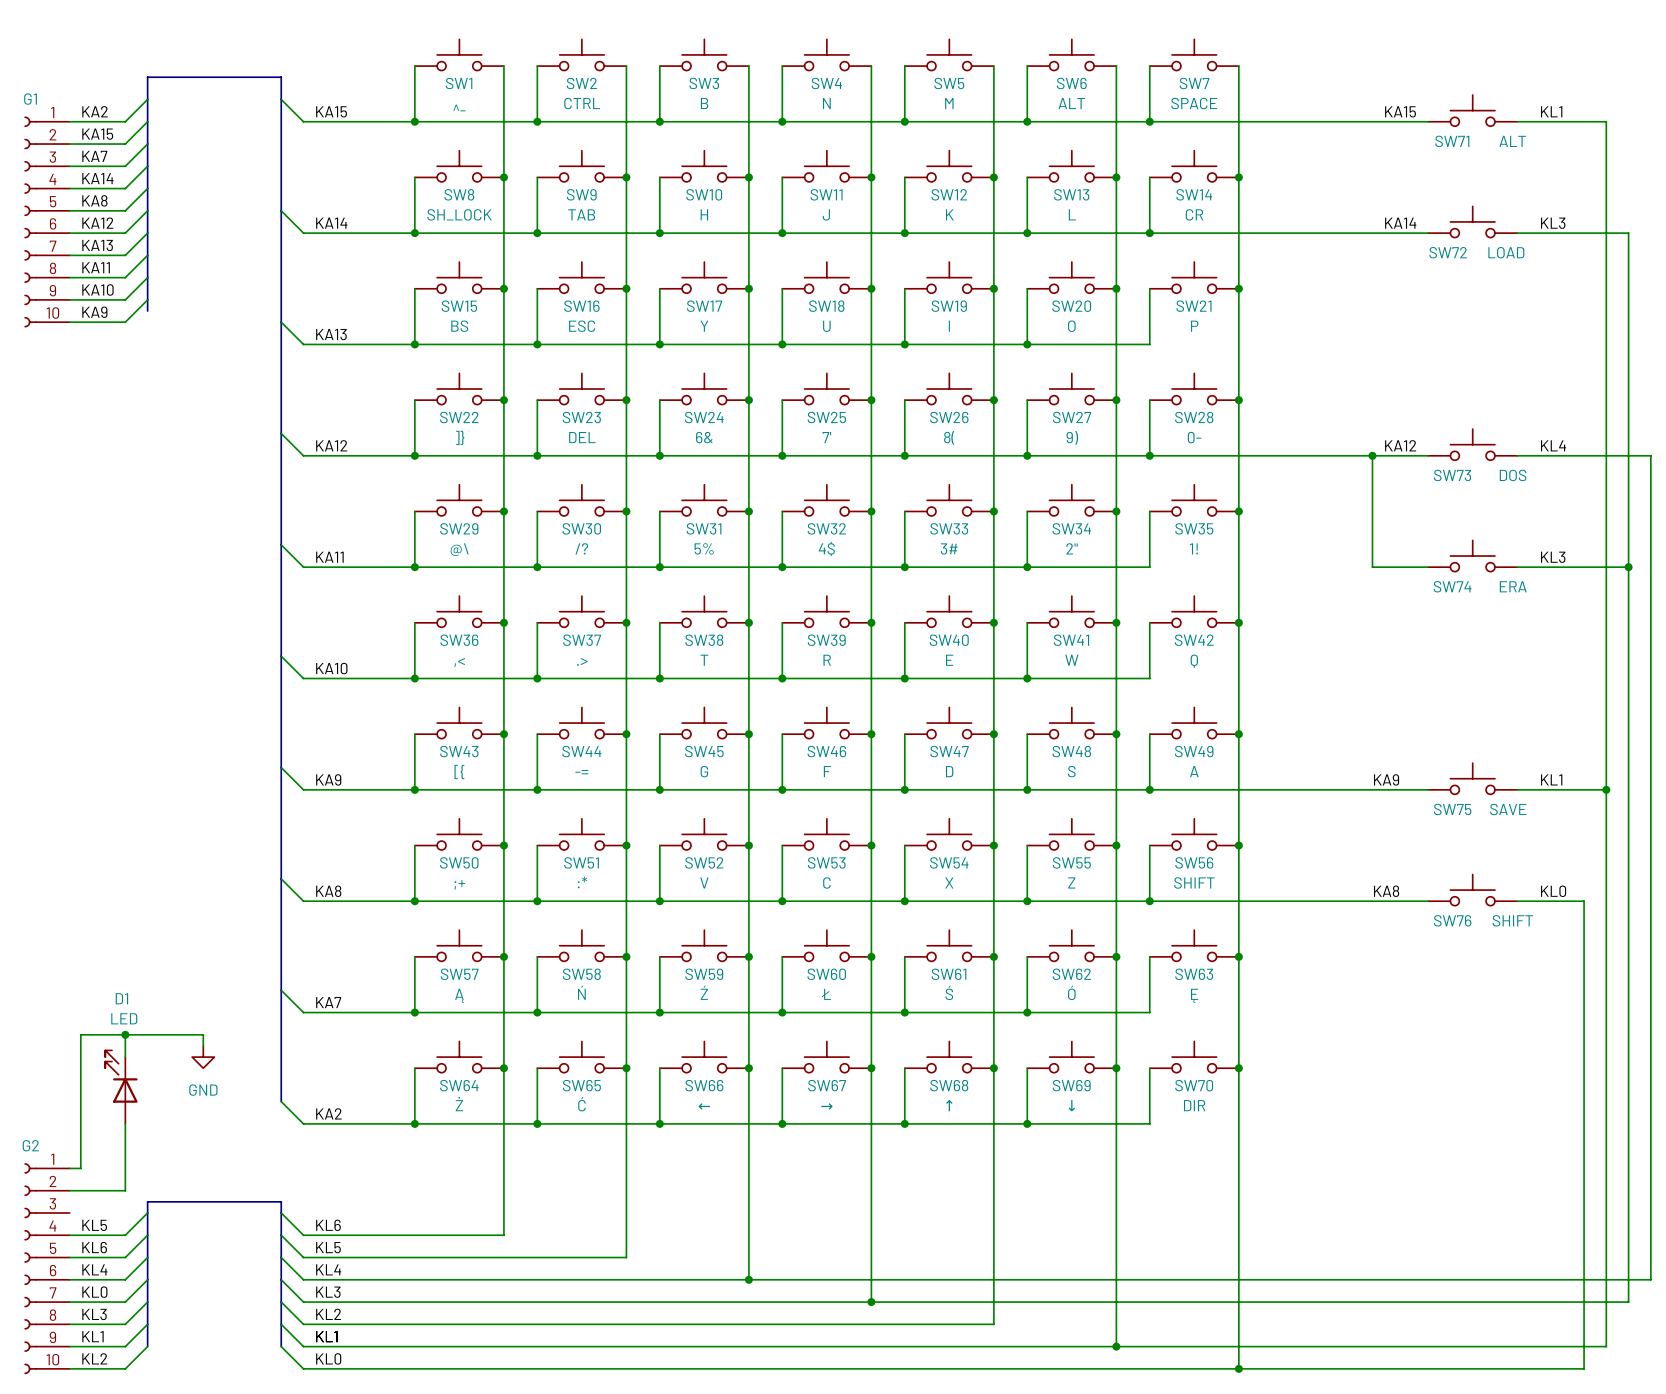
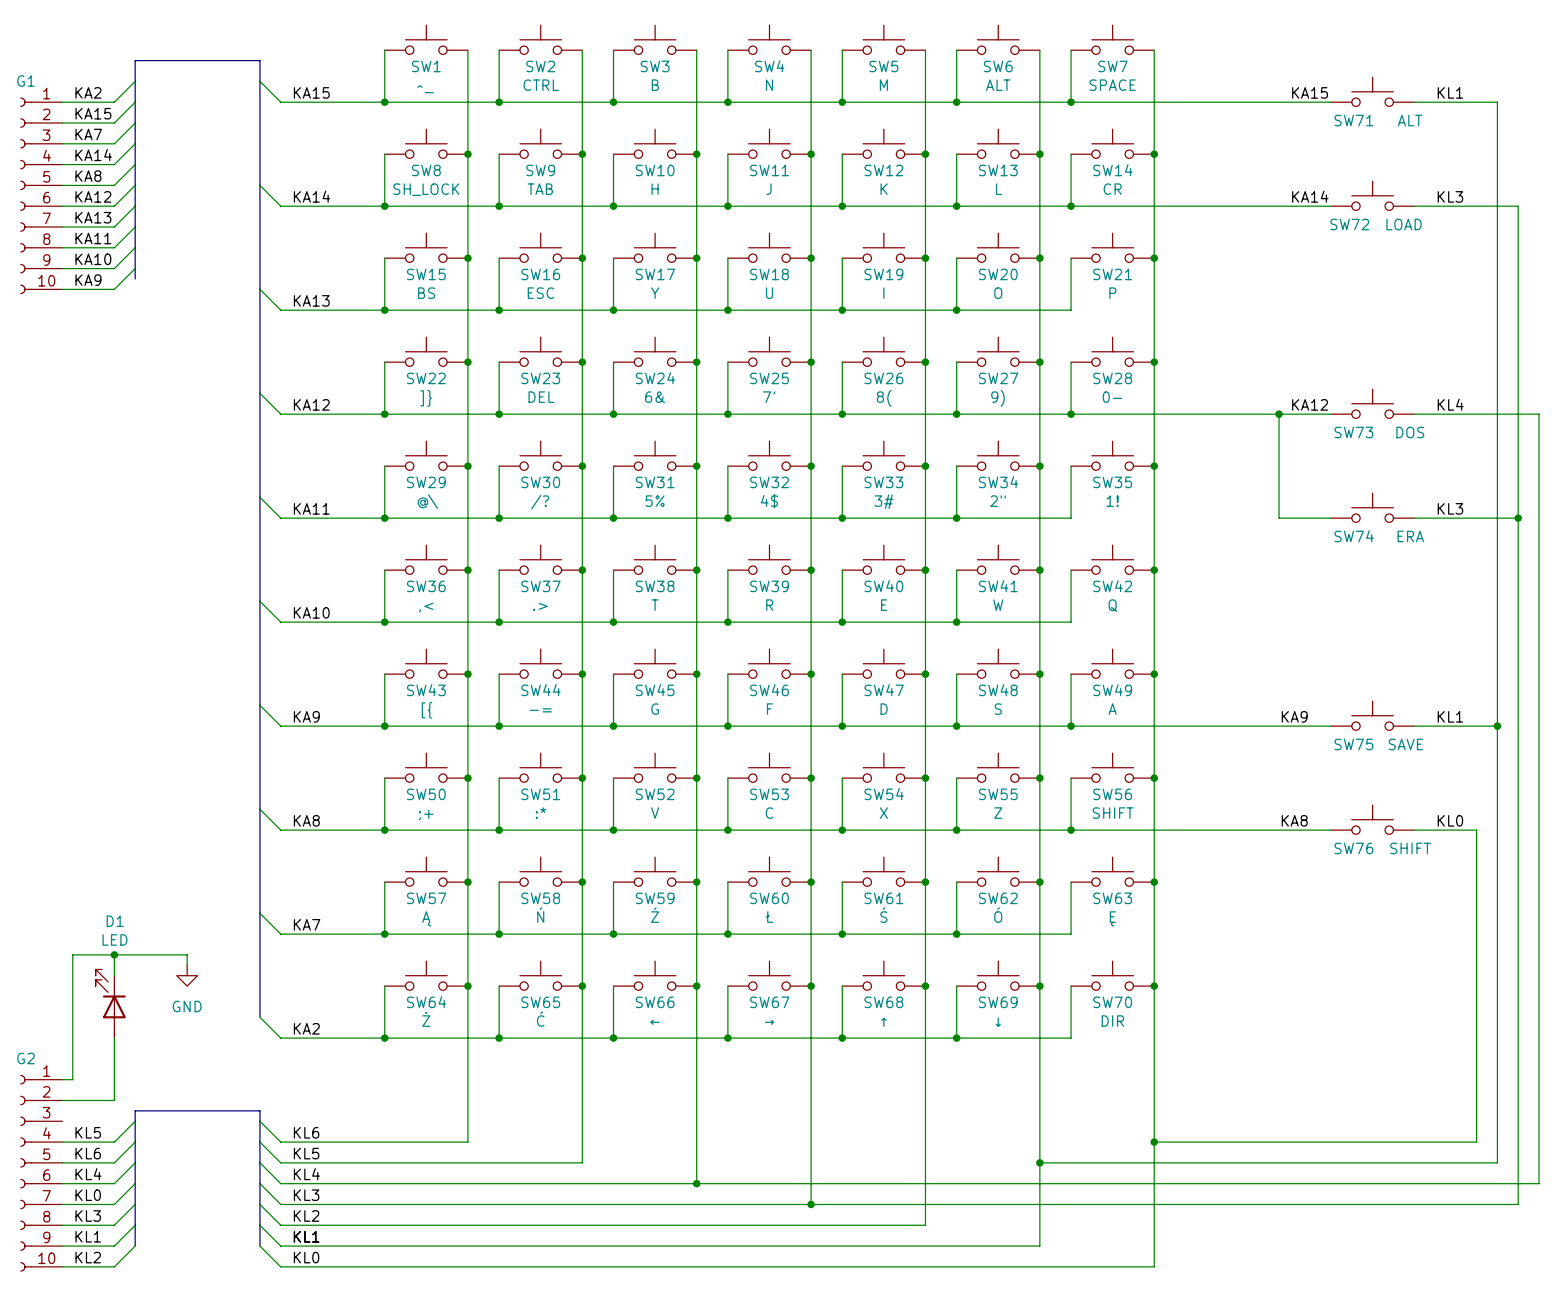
junction: none -> (1154, 1142)
wire: (1584, 1235) (1584, 1368) (1238, 1368) -> (1476, 1142) (1154, 1142)
junction: none -> (1039, 1162)
wire: (1606, 1257) (1606, 1346) (1116, 1346) -> (1497, 1162) (1039, 1162)
junction: (1116, 1346) -> none
junction: (1238, 1368) -> none

